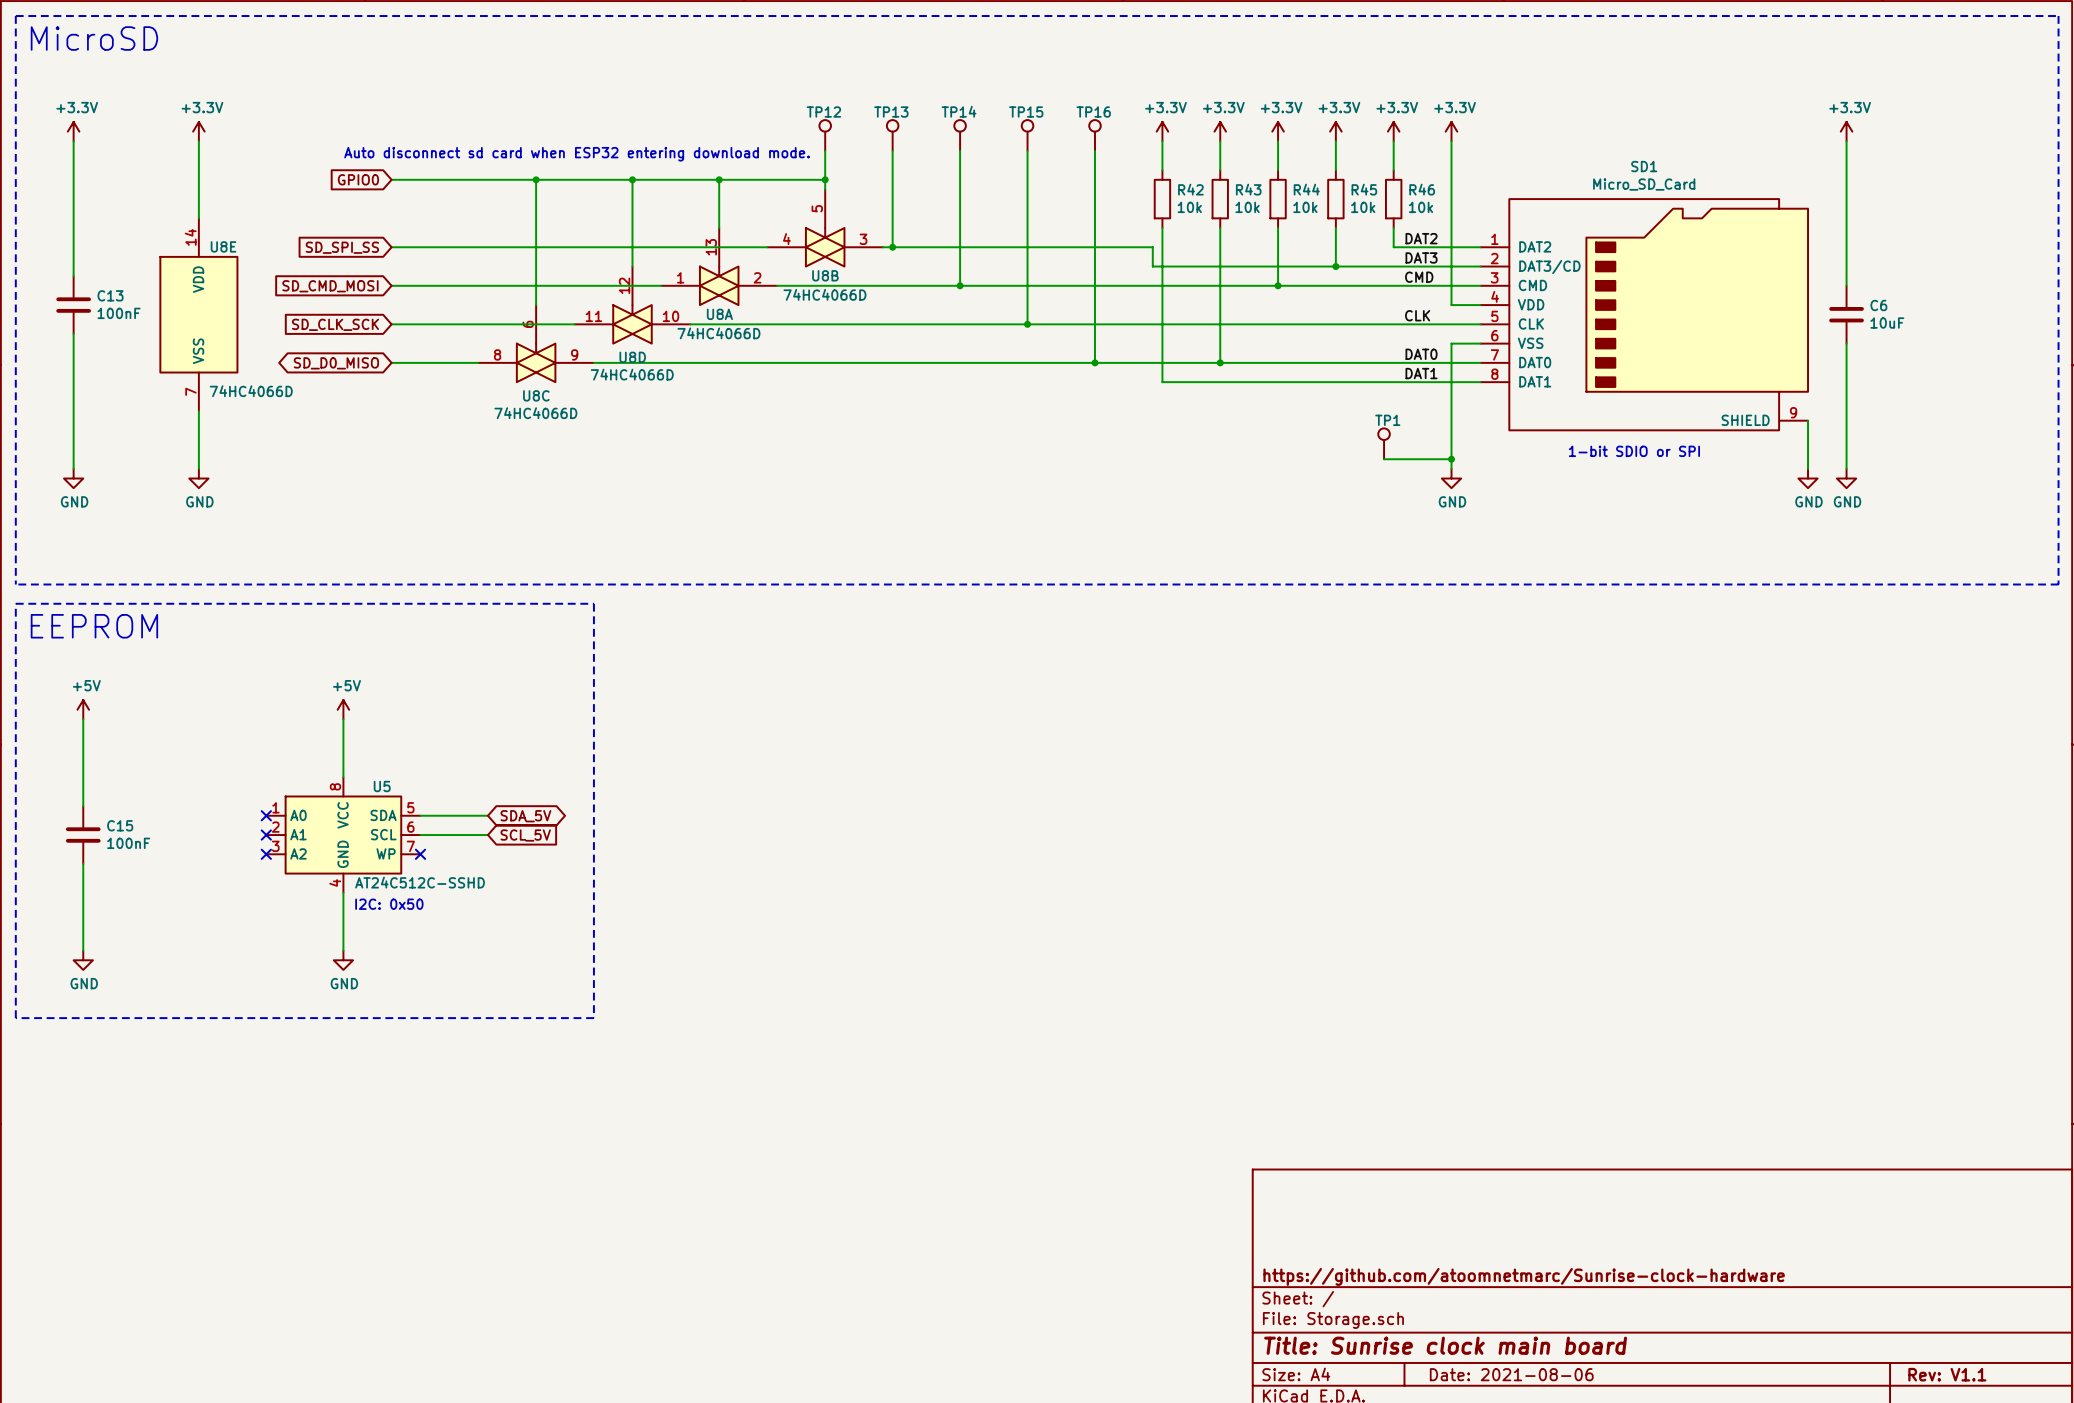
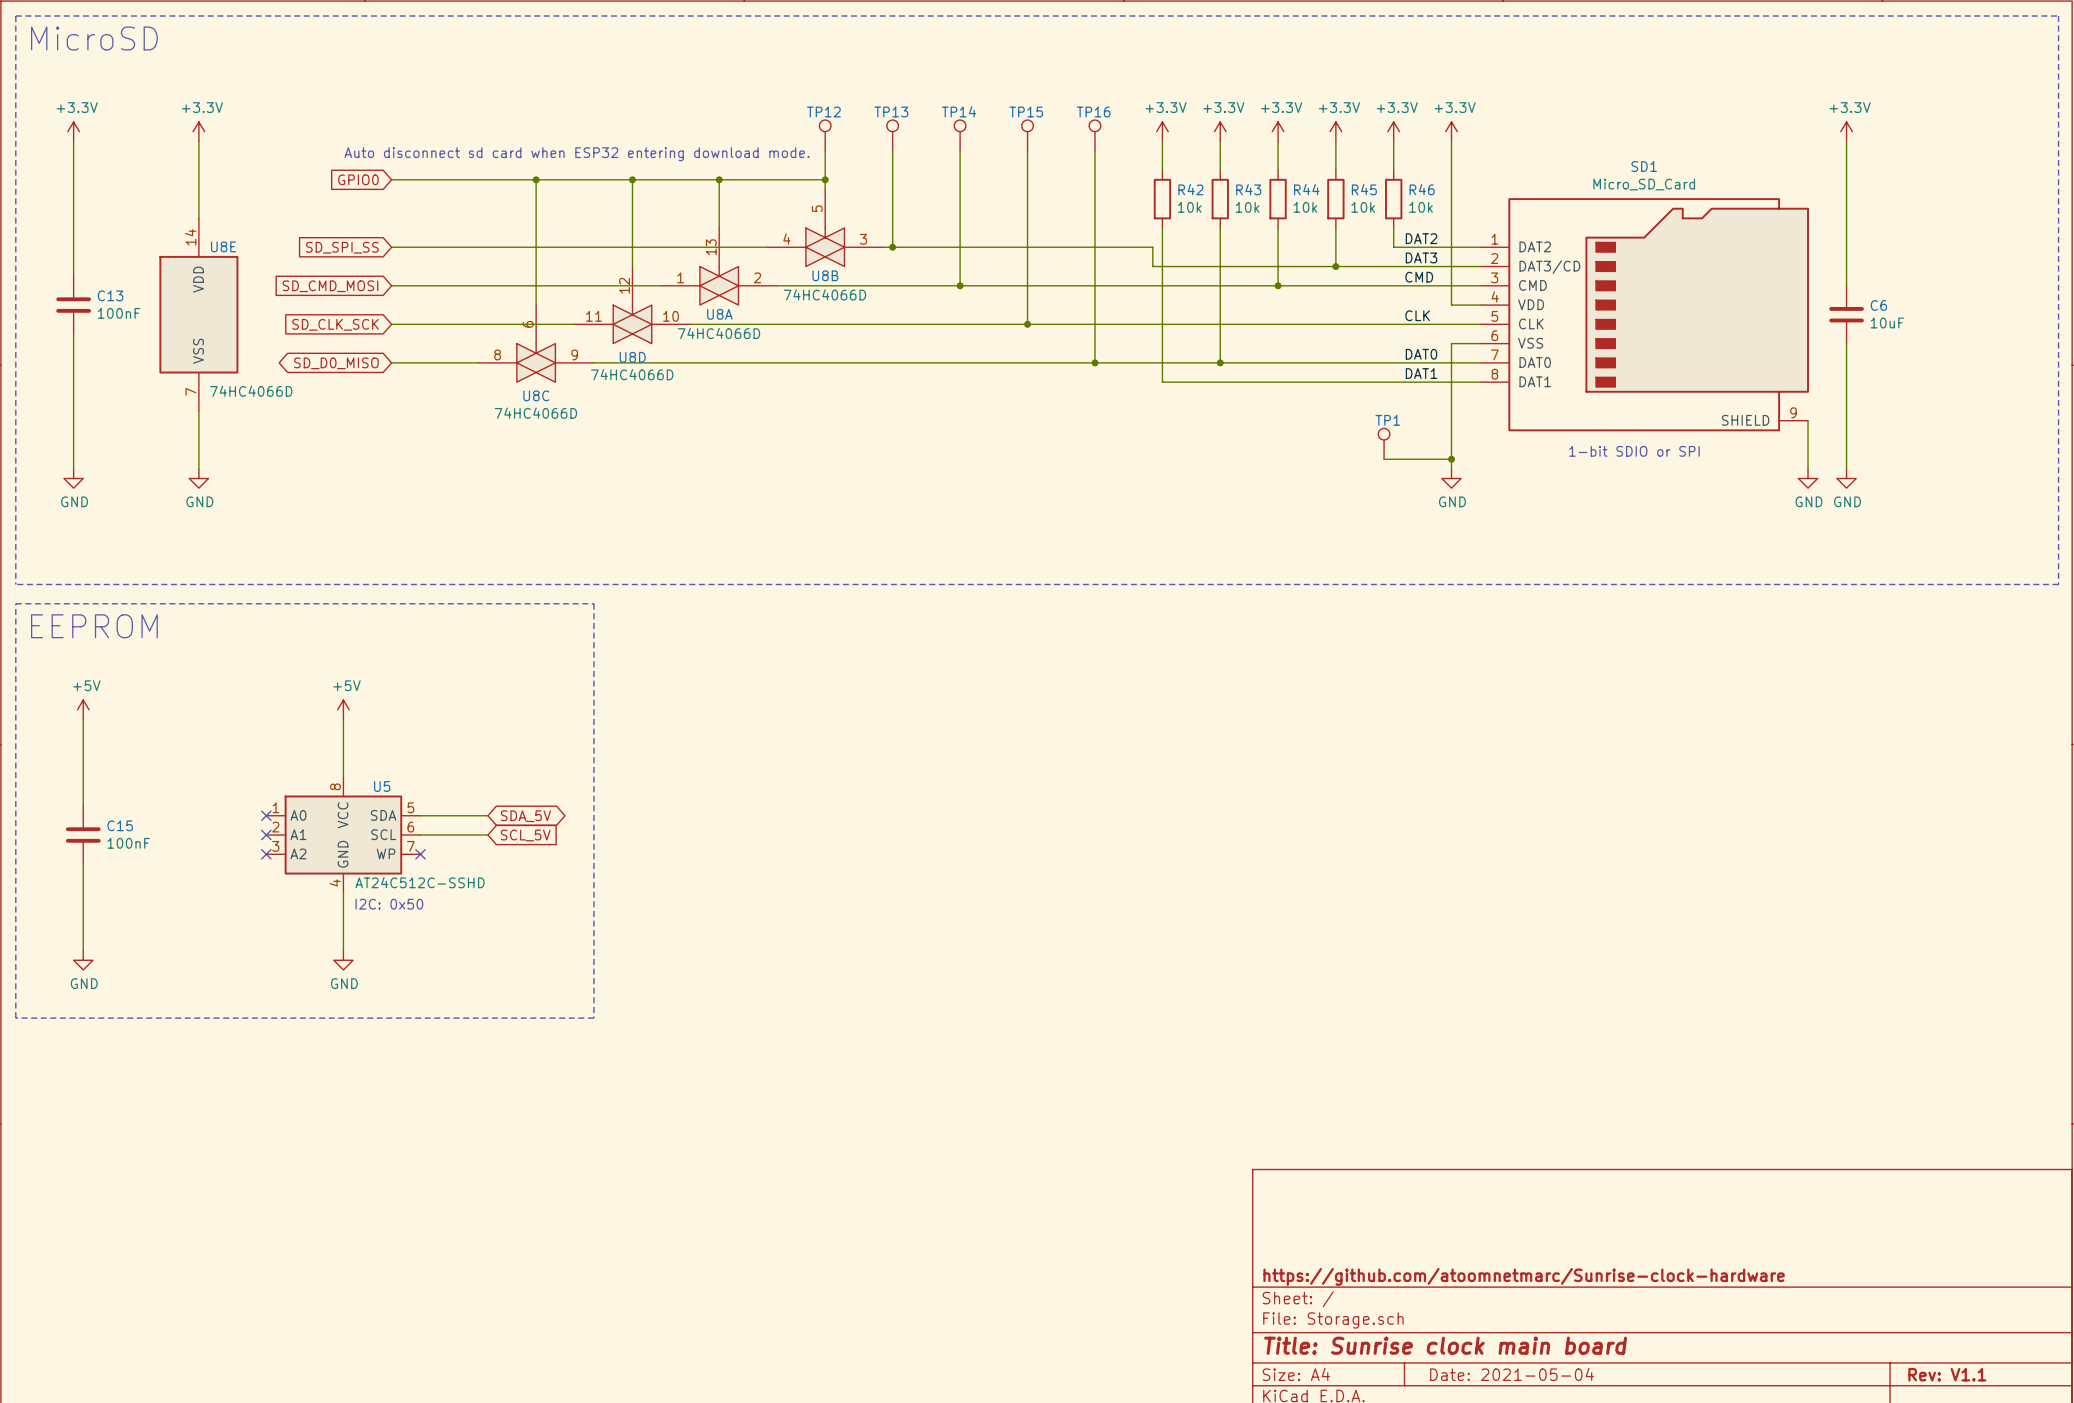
title block: Date: 2021-08-06 (1511, 1374) -> Date: 2021-05-04 (1512, 1374)

